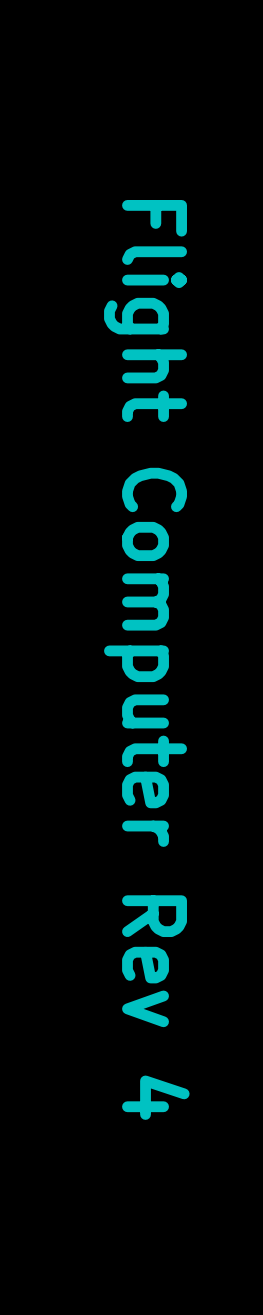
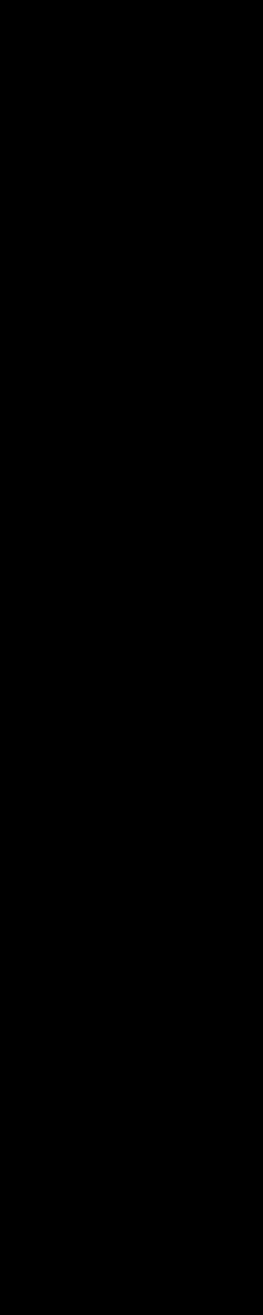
text: Flight Computer Rev 4 (146, 659) -> none

